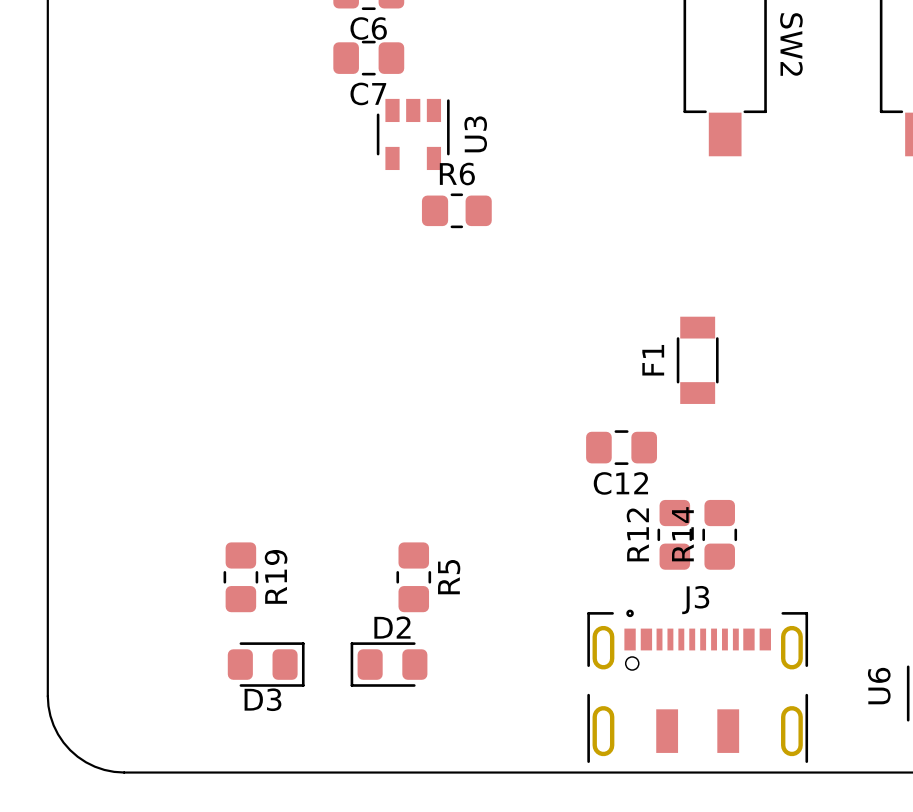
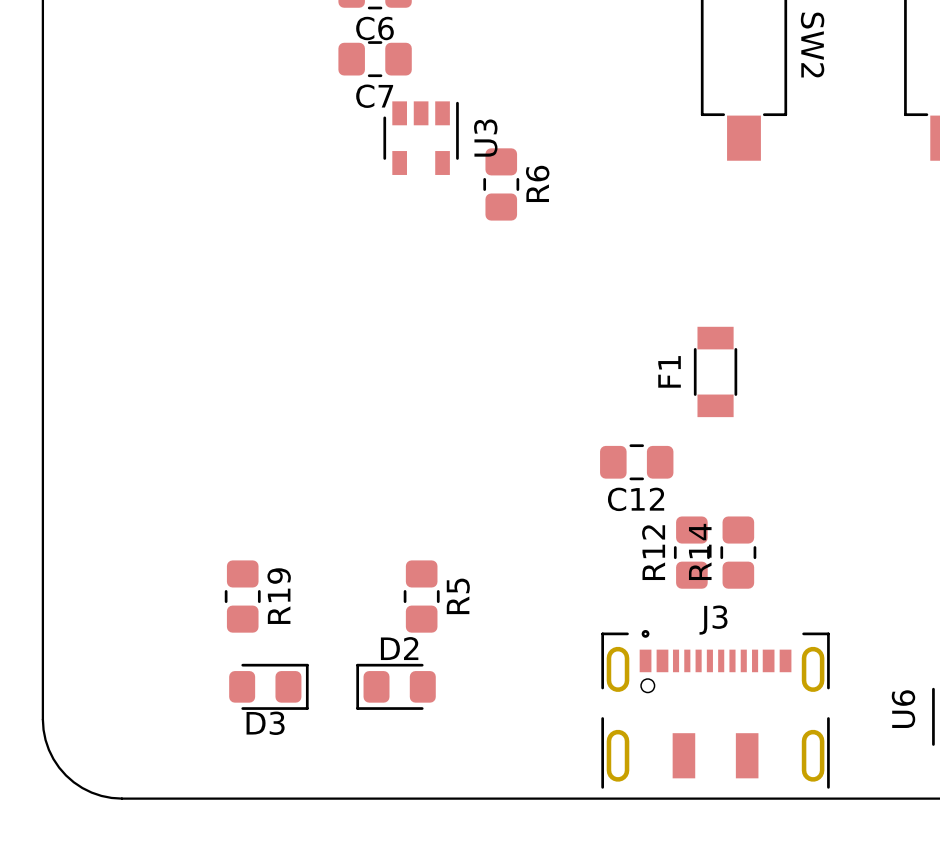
R6 rotation: 0° (456, 210) -> 90° clockwise (501, 184)
R6 position: (456, 210) -> (501, 184)

